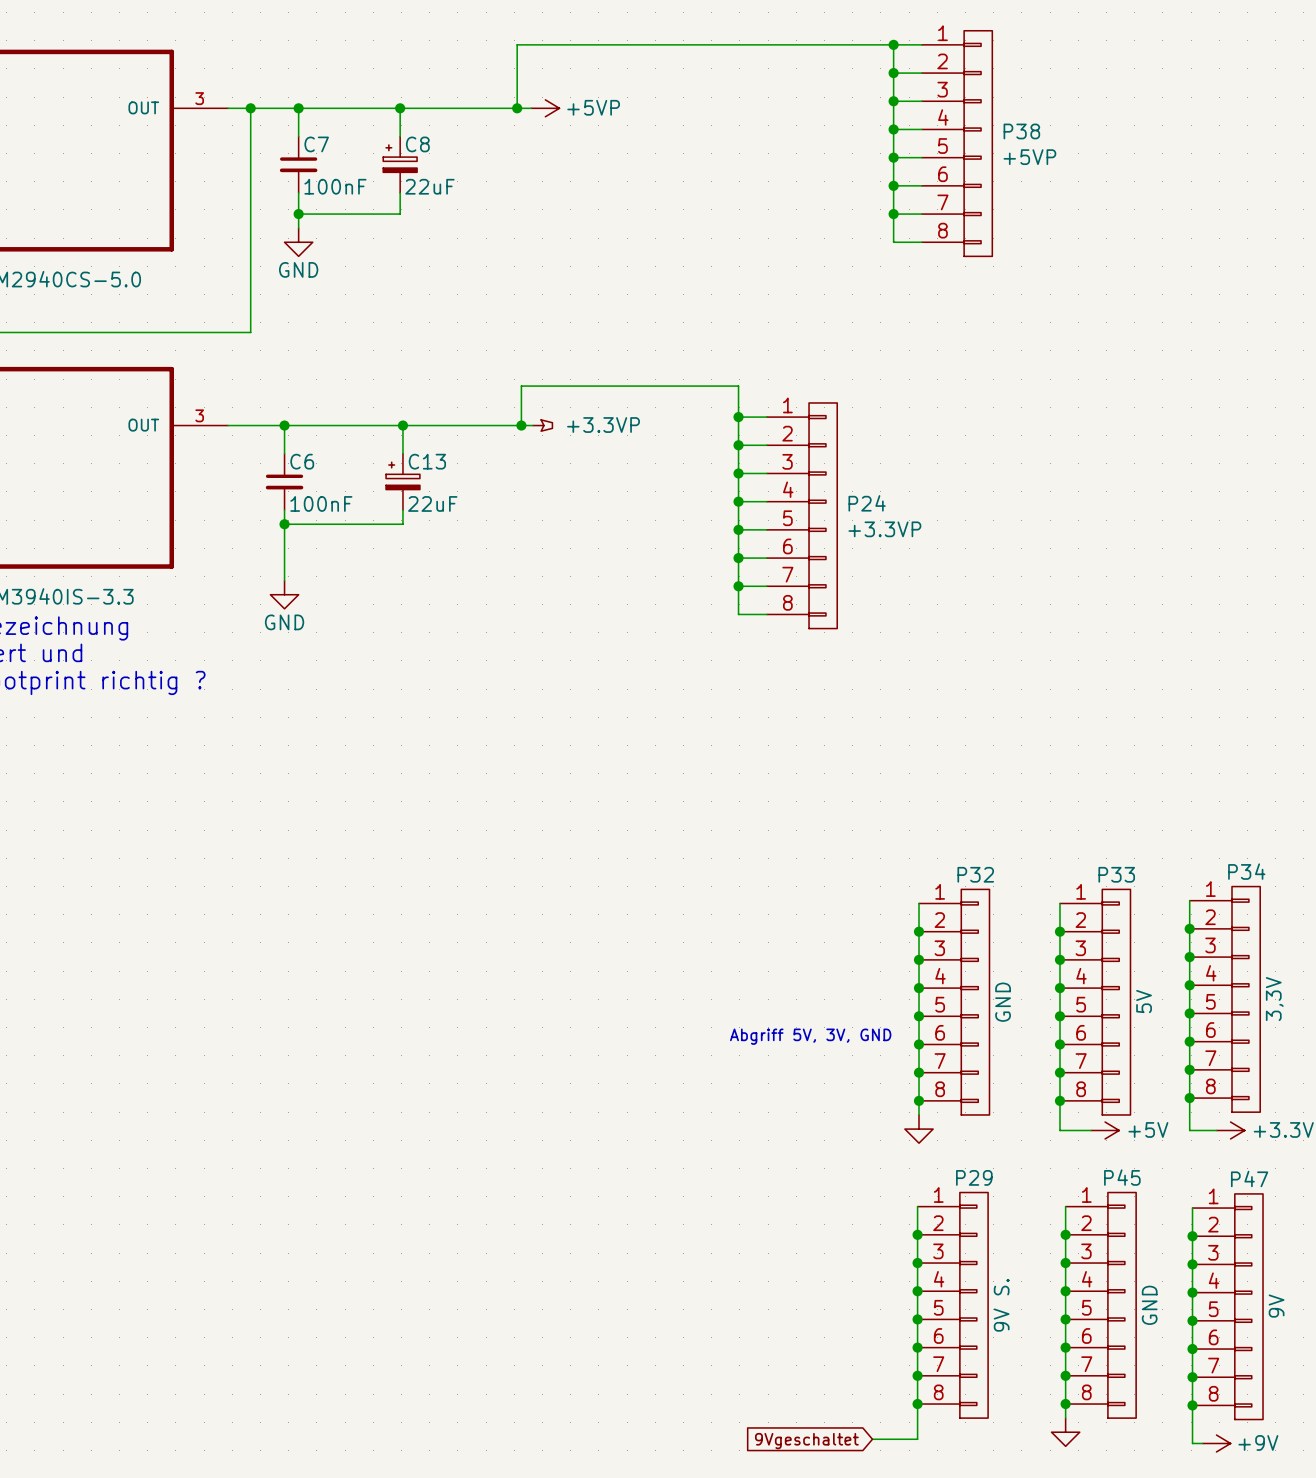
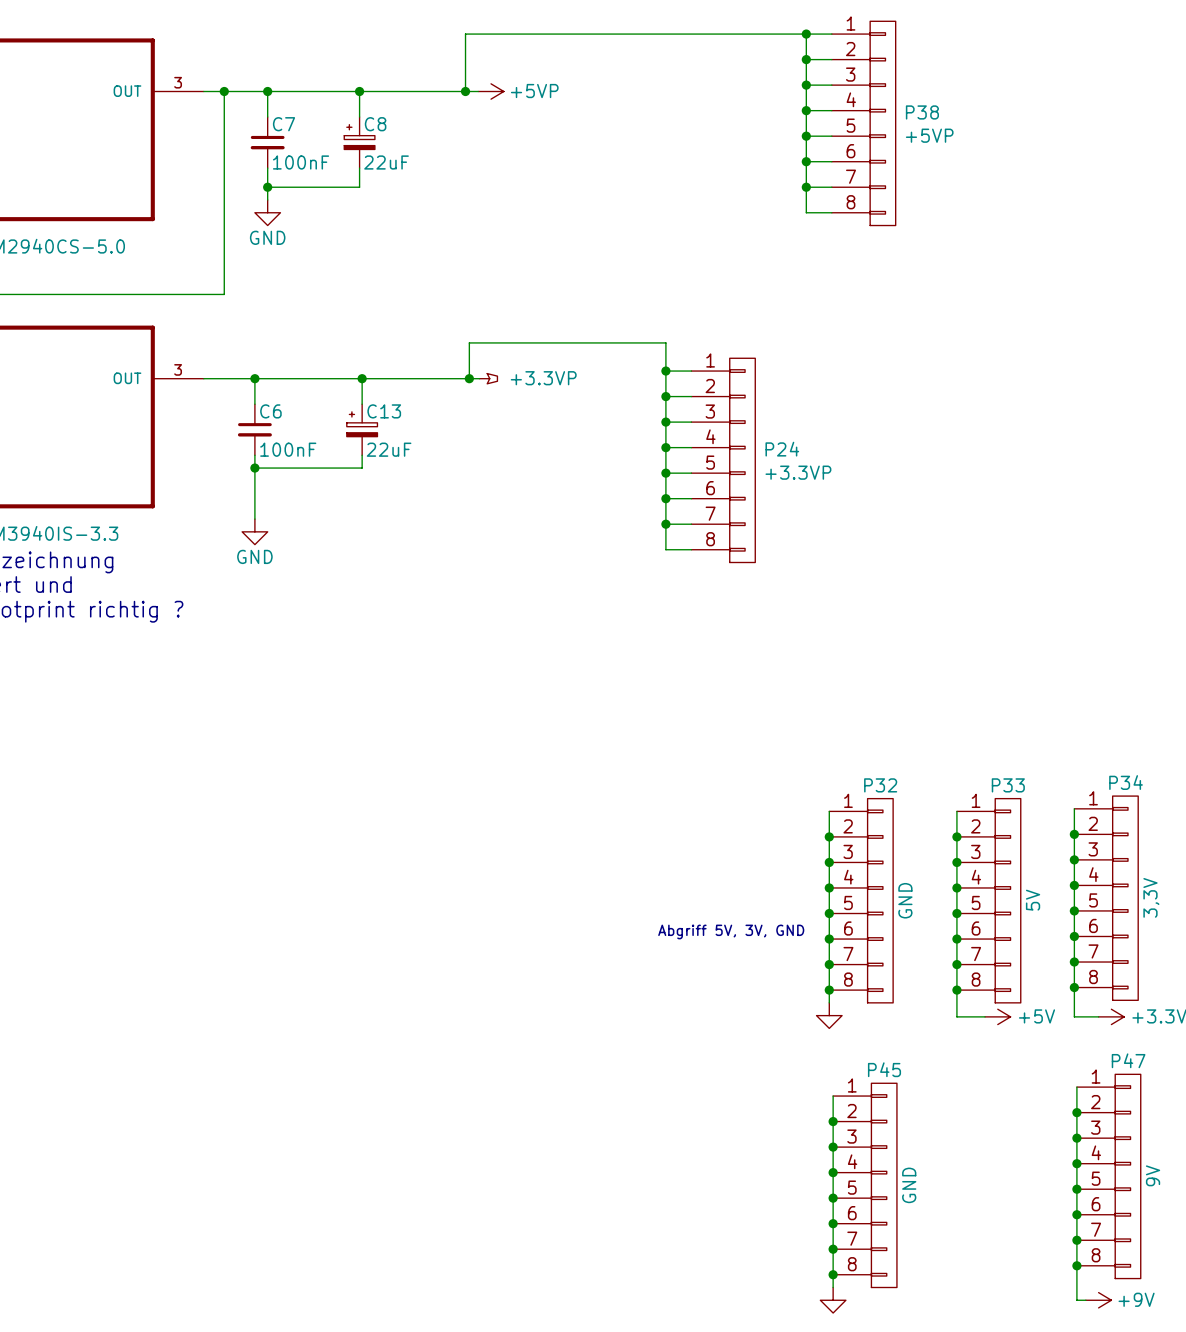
wire: (917, 1206) (917, 1439) (872, 1439) -> none
wire: (1065, 1206) (1065, 1418) -> (833, 1096) (833, 1287)
junction: (917, 1234) -> none
junction: (1065, 1234) -> none
junction: none -> (833, 1121)
junction: (917, 1263) -> none
junction: (1065, 1263) -> none
junction: none -> (833, 1147)
junction: (917, 1291) -> none
junction: (1065, 1291) -> none
junction: none -> (833, 1172)
P29: 9V S. (952, 1305) -> none
P45 position: (1100, 1305) -> (865, 1185)
junction: (917, 1319) -> none
junction: (1065, 1319) -> none
junction: none -> (833, 1198)
junction: (917, 1347) -> none
junction: (1065, 1347) -> none
junction: none -> (833, 1223)
junction: (917, 1375) -> none
junction: (1065, 1375) -> none
junction: none -> (833, 1249)
junction: (917, 1404) -> none
junction: (1065, 1404) -> none
junction: none -> (833, 1274)
power symbol position: (1065, 1432) -> (833, 1300)
global label: 9Vgeschaltet (806, 1441) -> none

